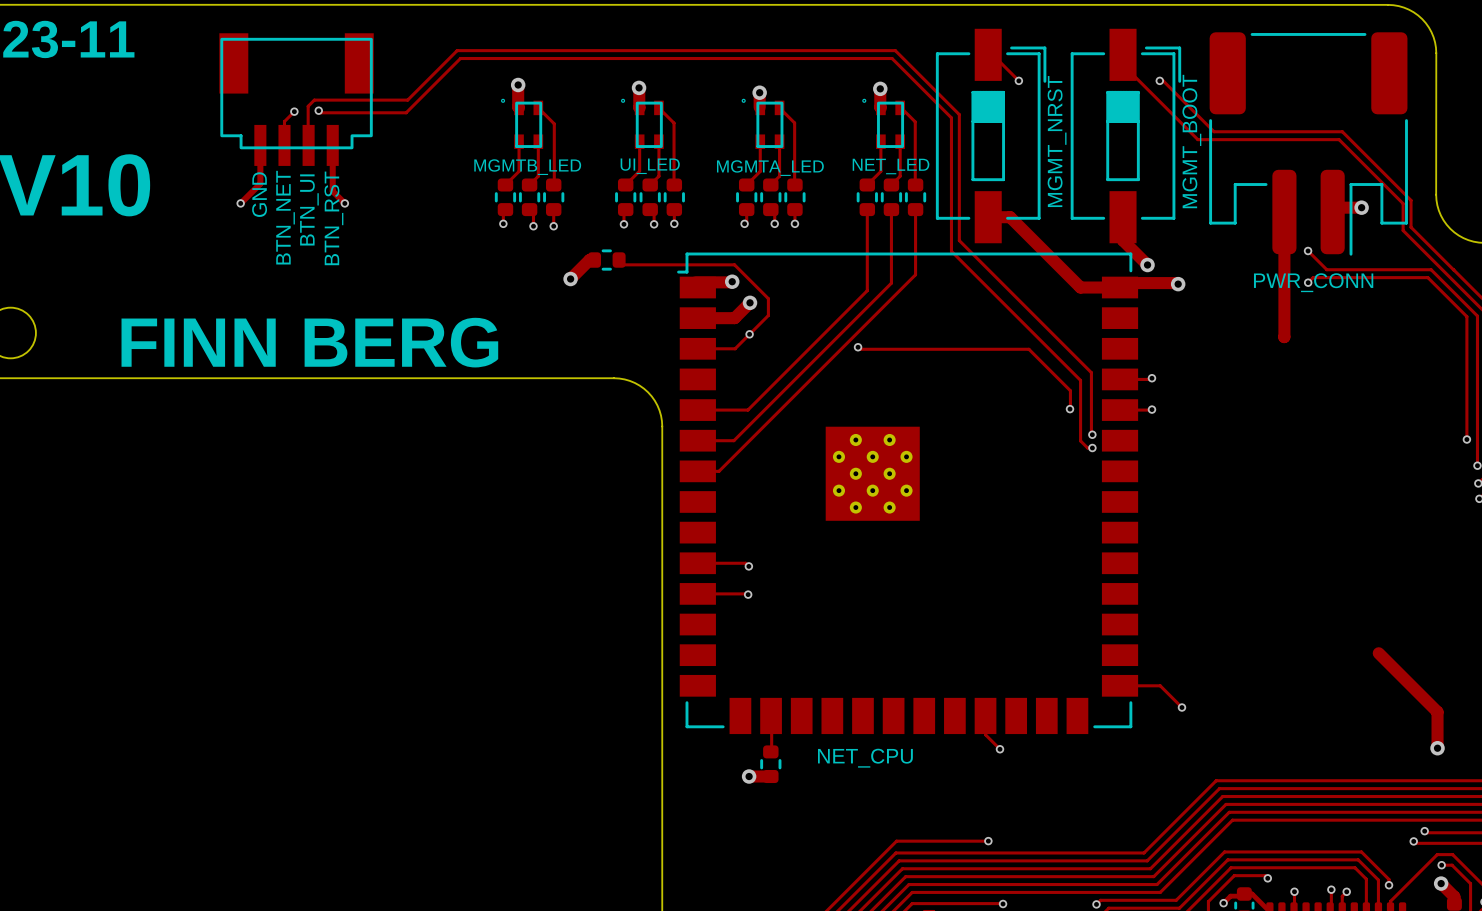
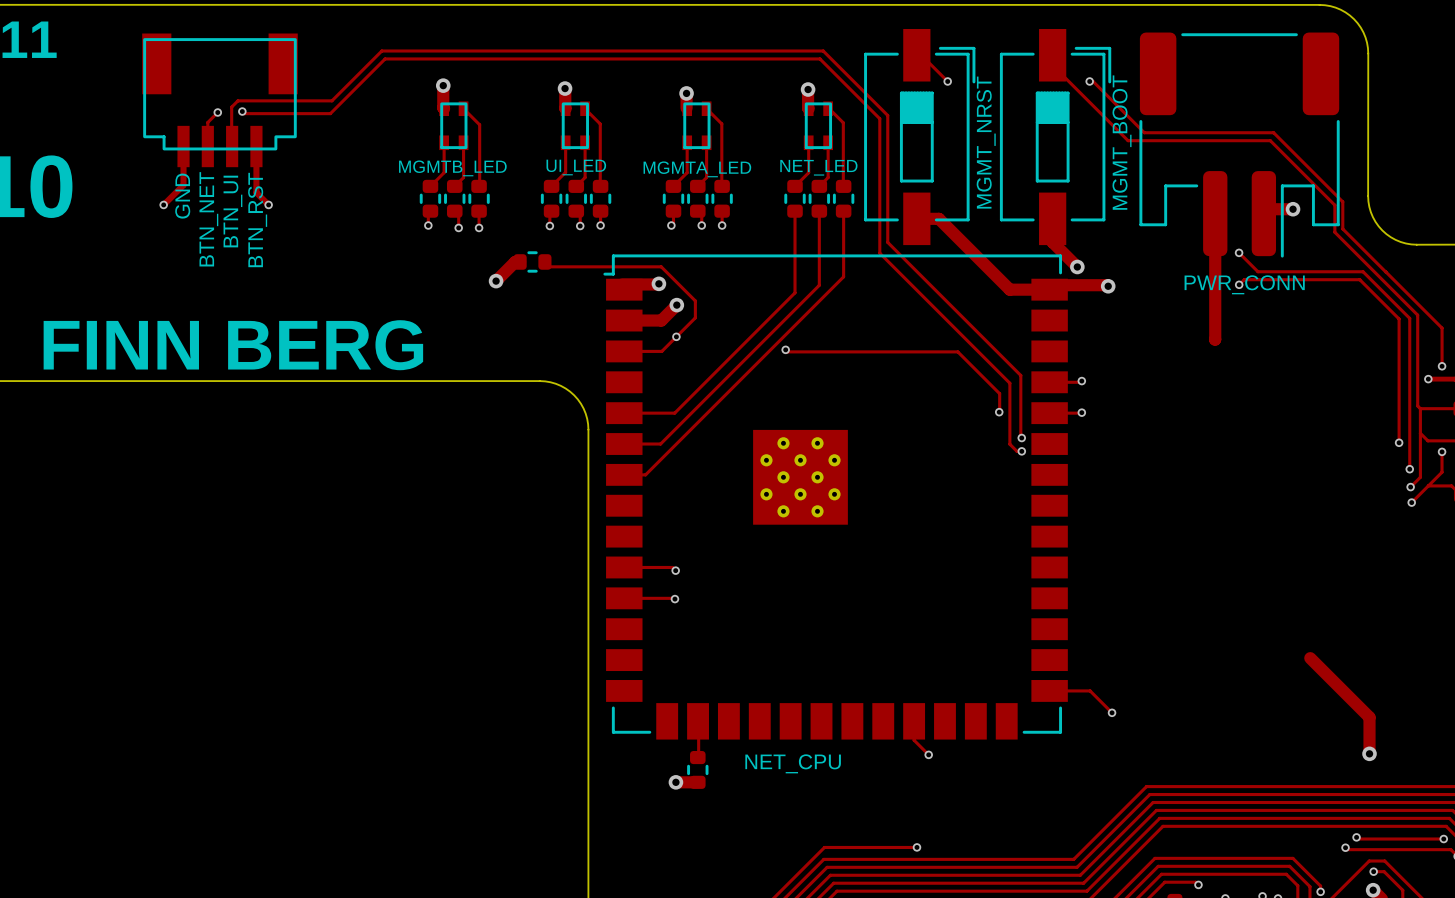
drawing: [501, 98, 506, 103] -> none
drawing: [621, 98, 626, 103] -> none
drawing: [741, 98, 746, 103] -> none
drawing: [862, 98, 867, 103] -> none

